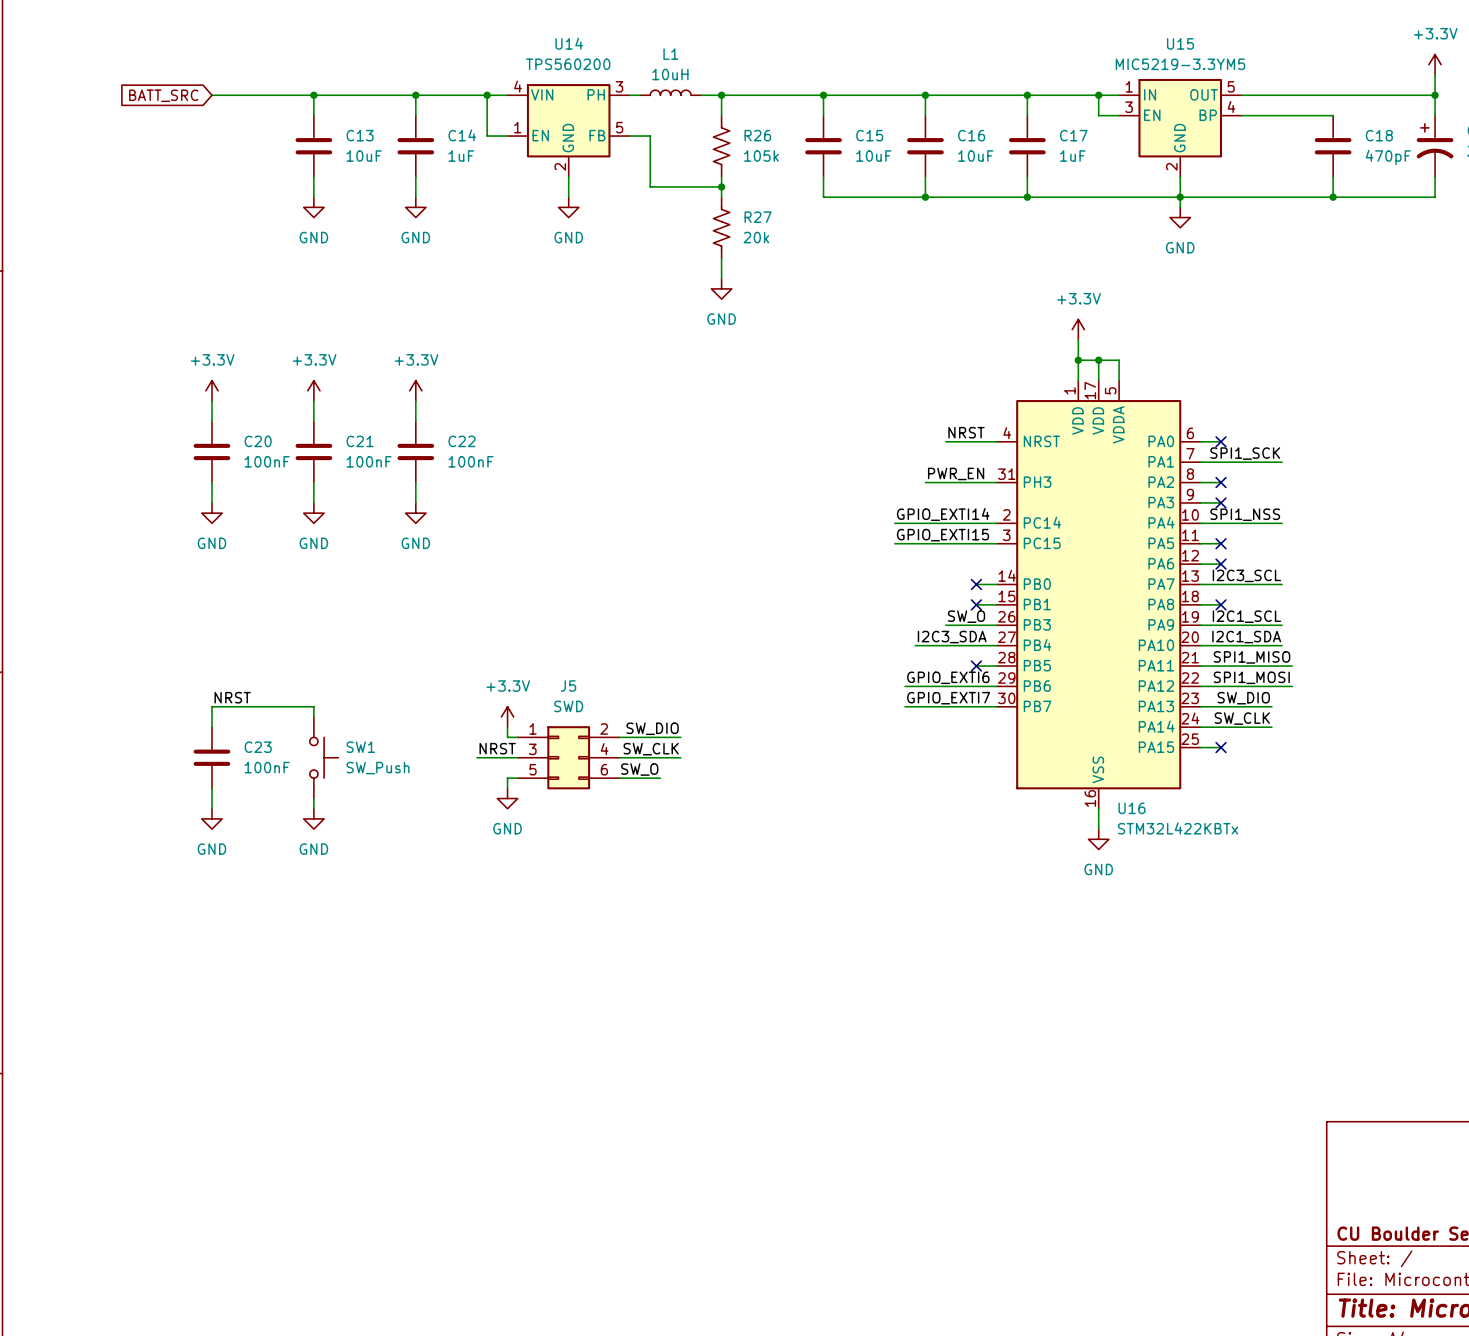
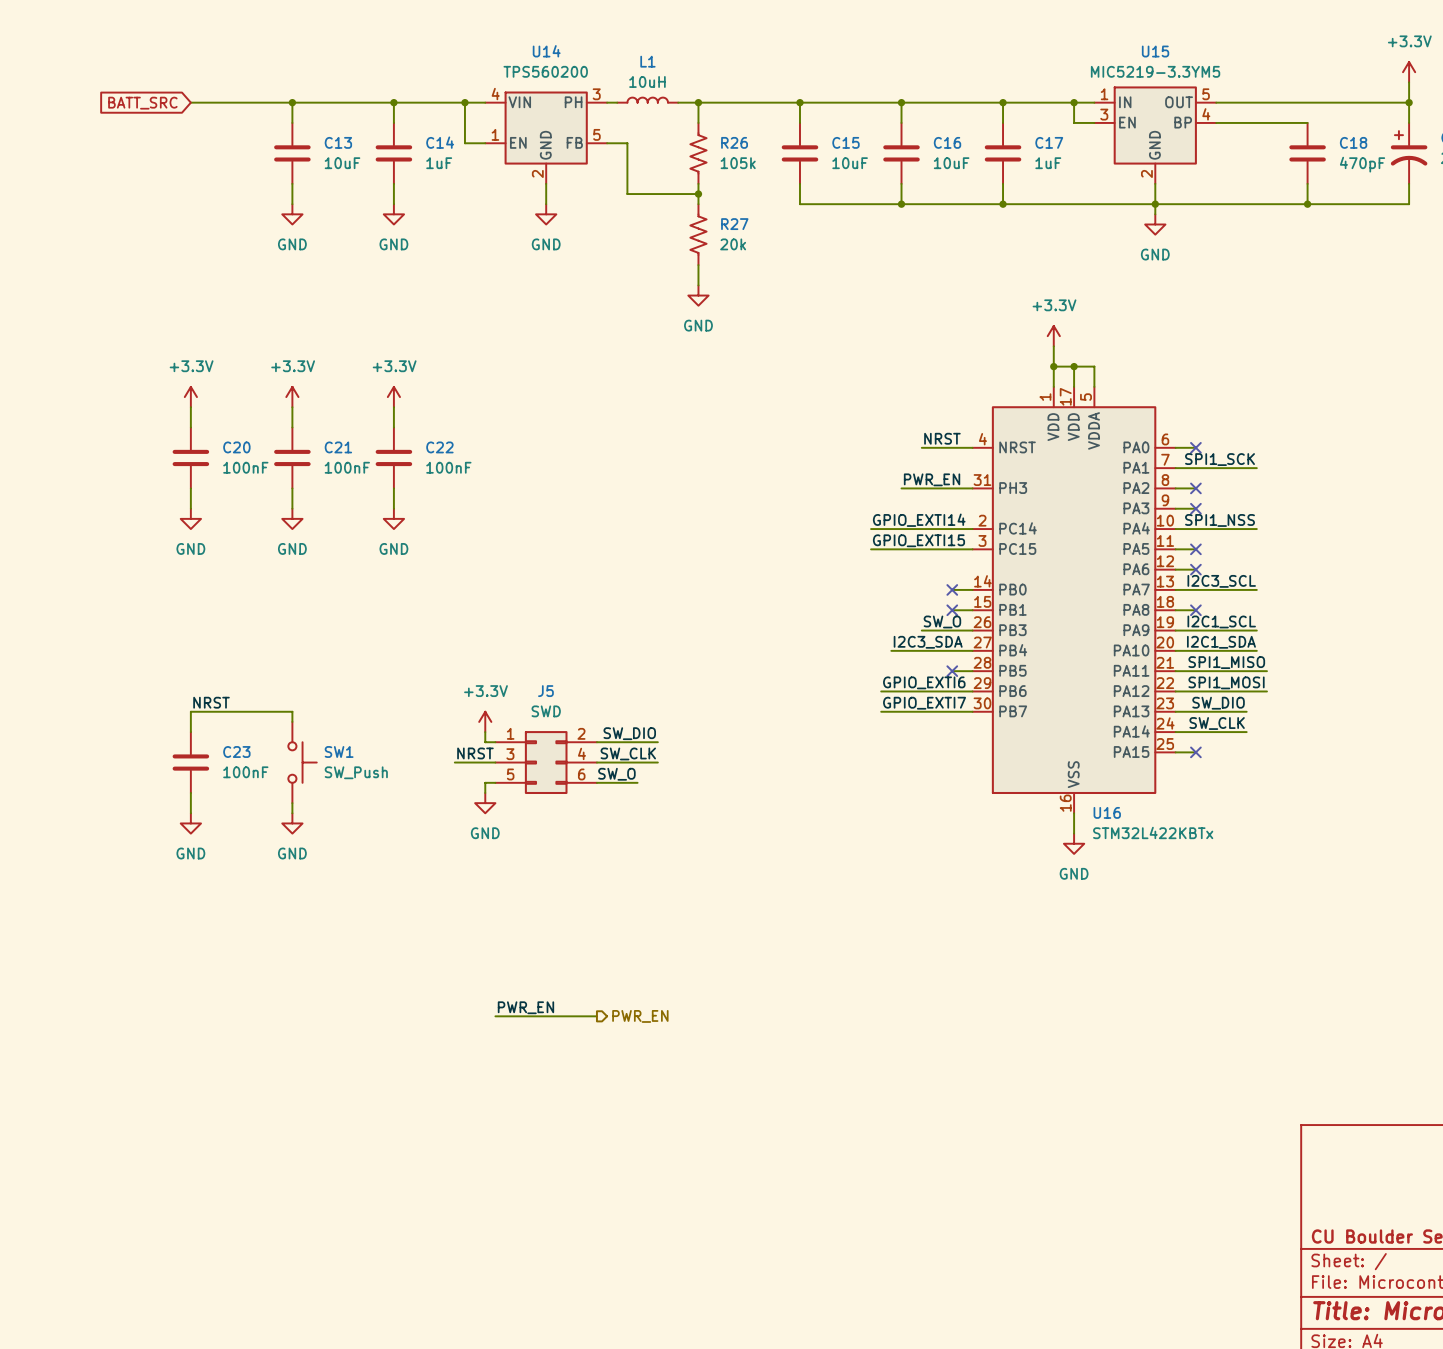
label: none -> PWR_EN (525, 1007)
wire: none -> (495, 1016) (596, 1016)
hierarchical label: none -> PWR_EN (640, 1016)

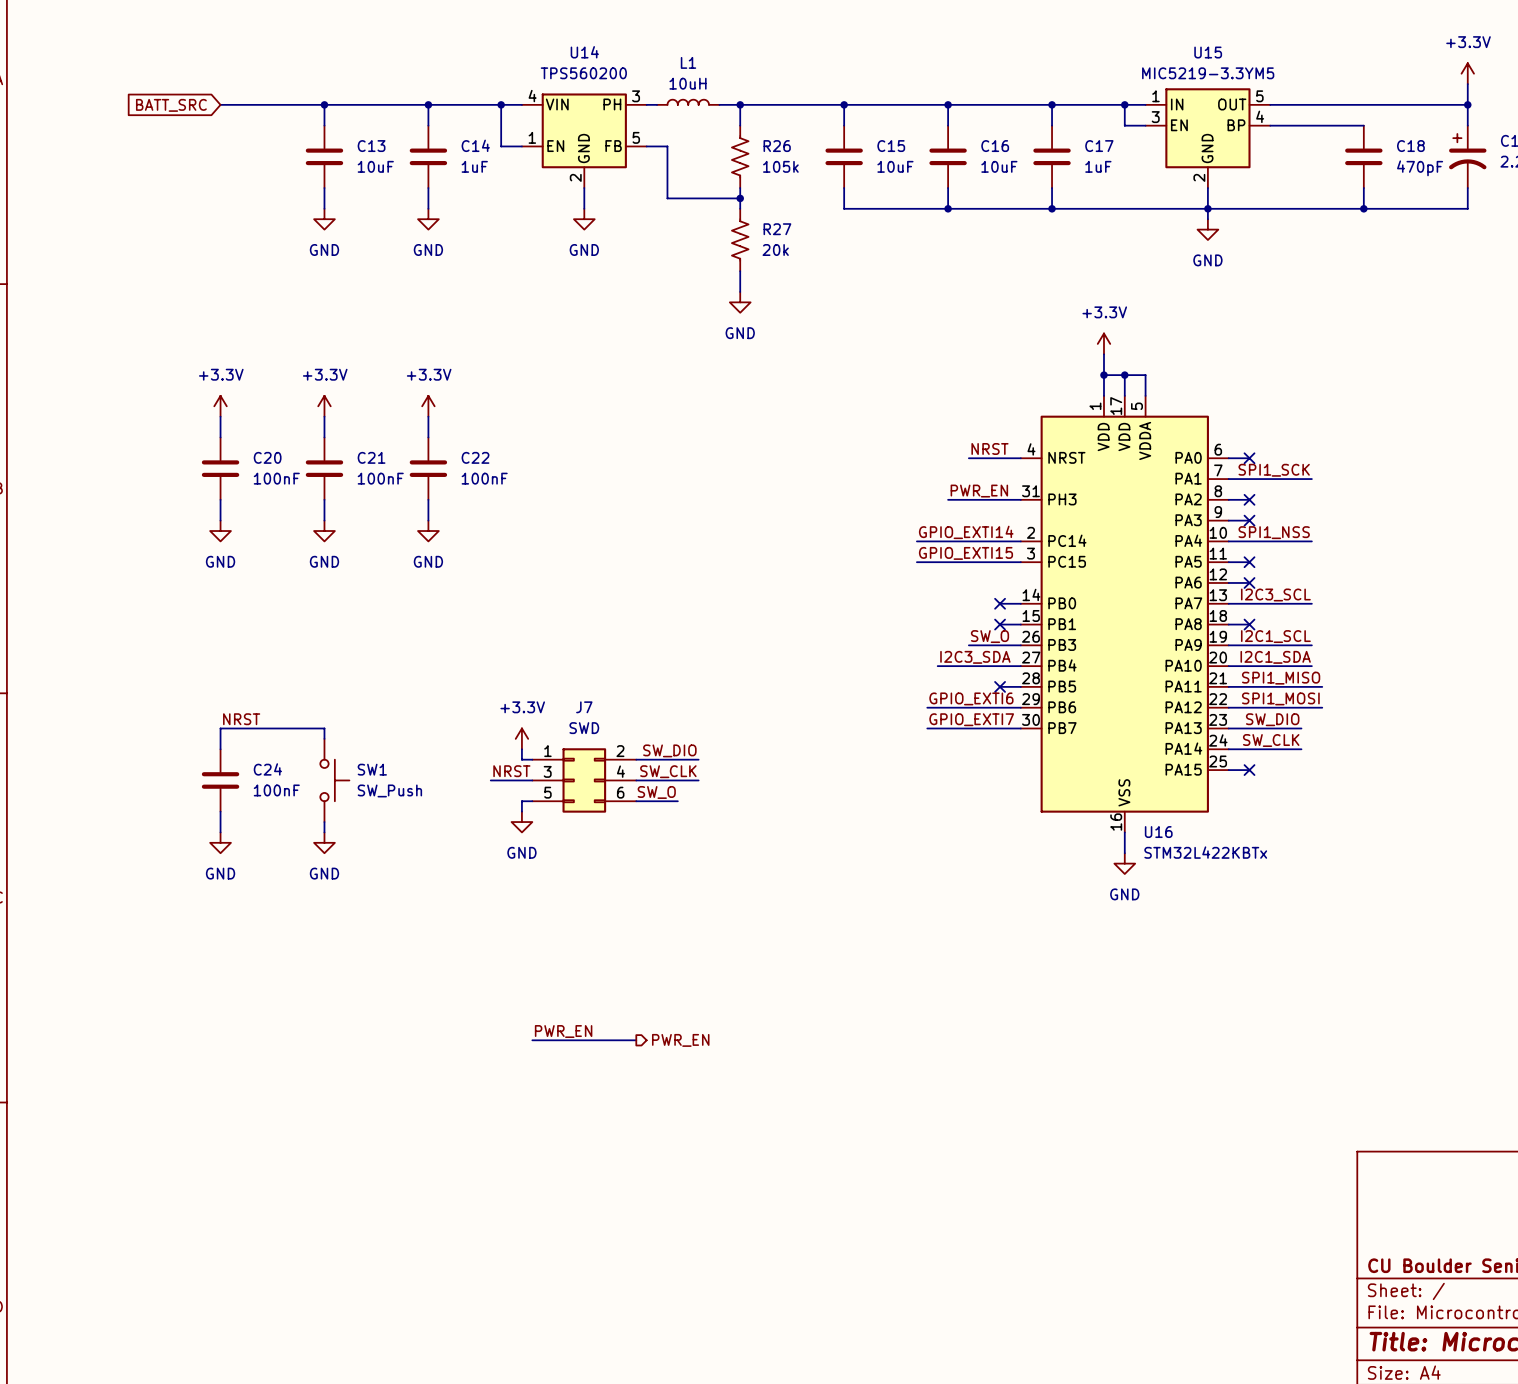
J5 name: J5 (545, 691) -> J7 (584, 707)
C23 name: C23 (236, 752) -> C24 (267, 769)

